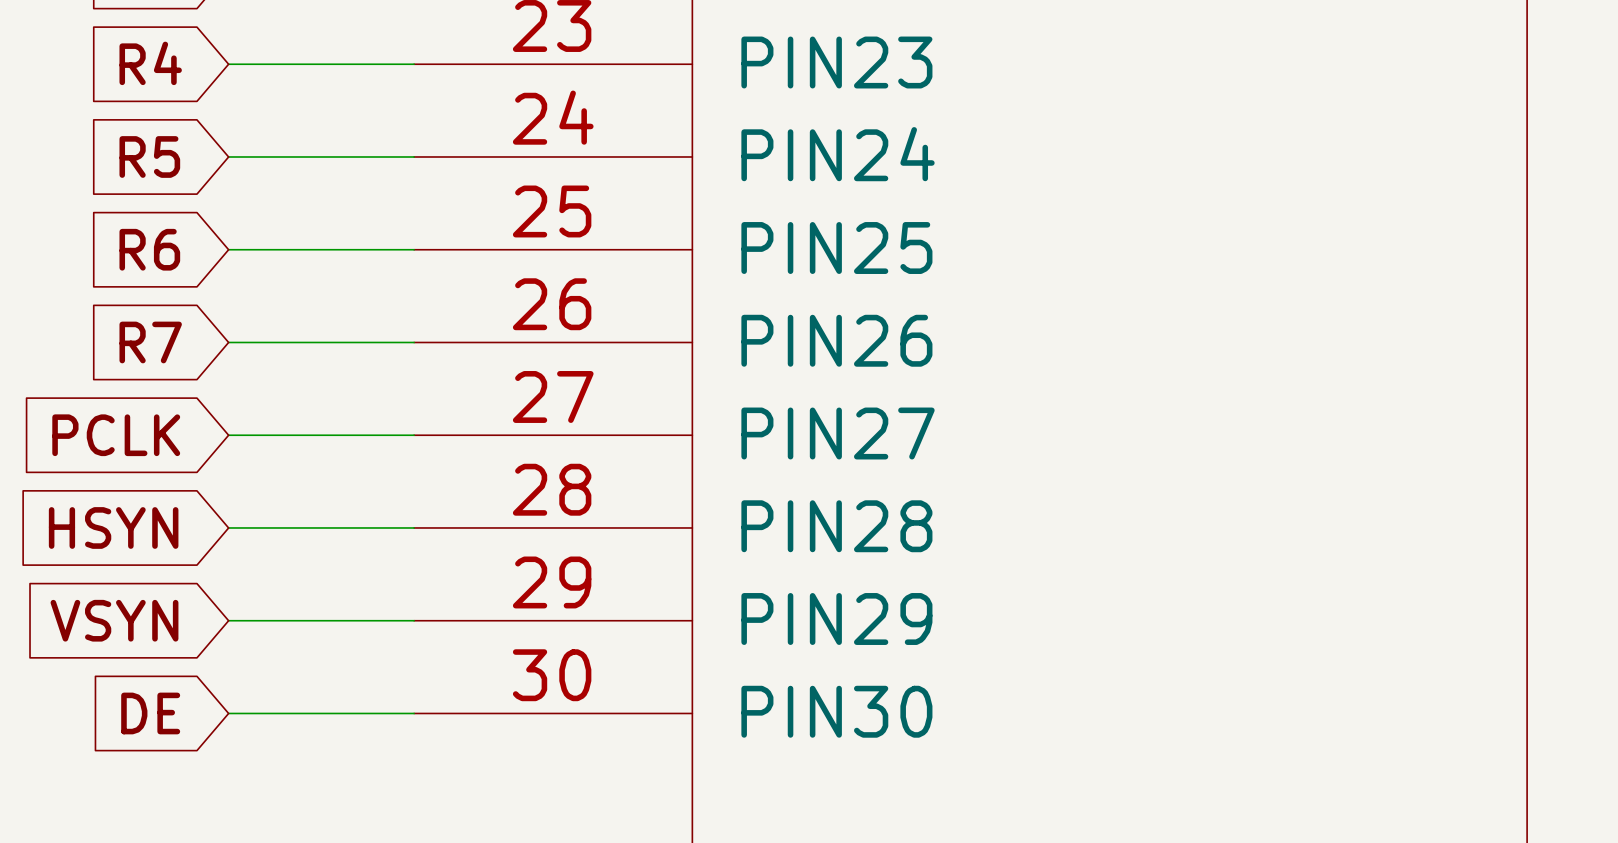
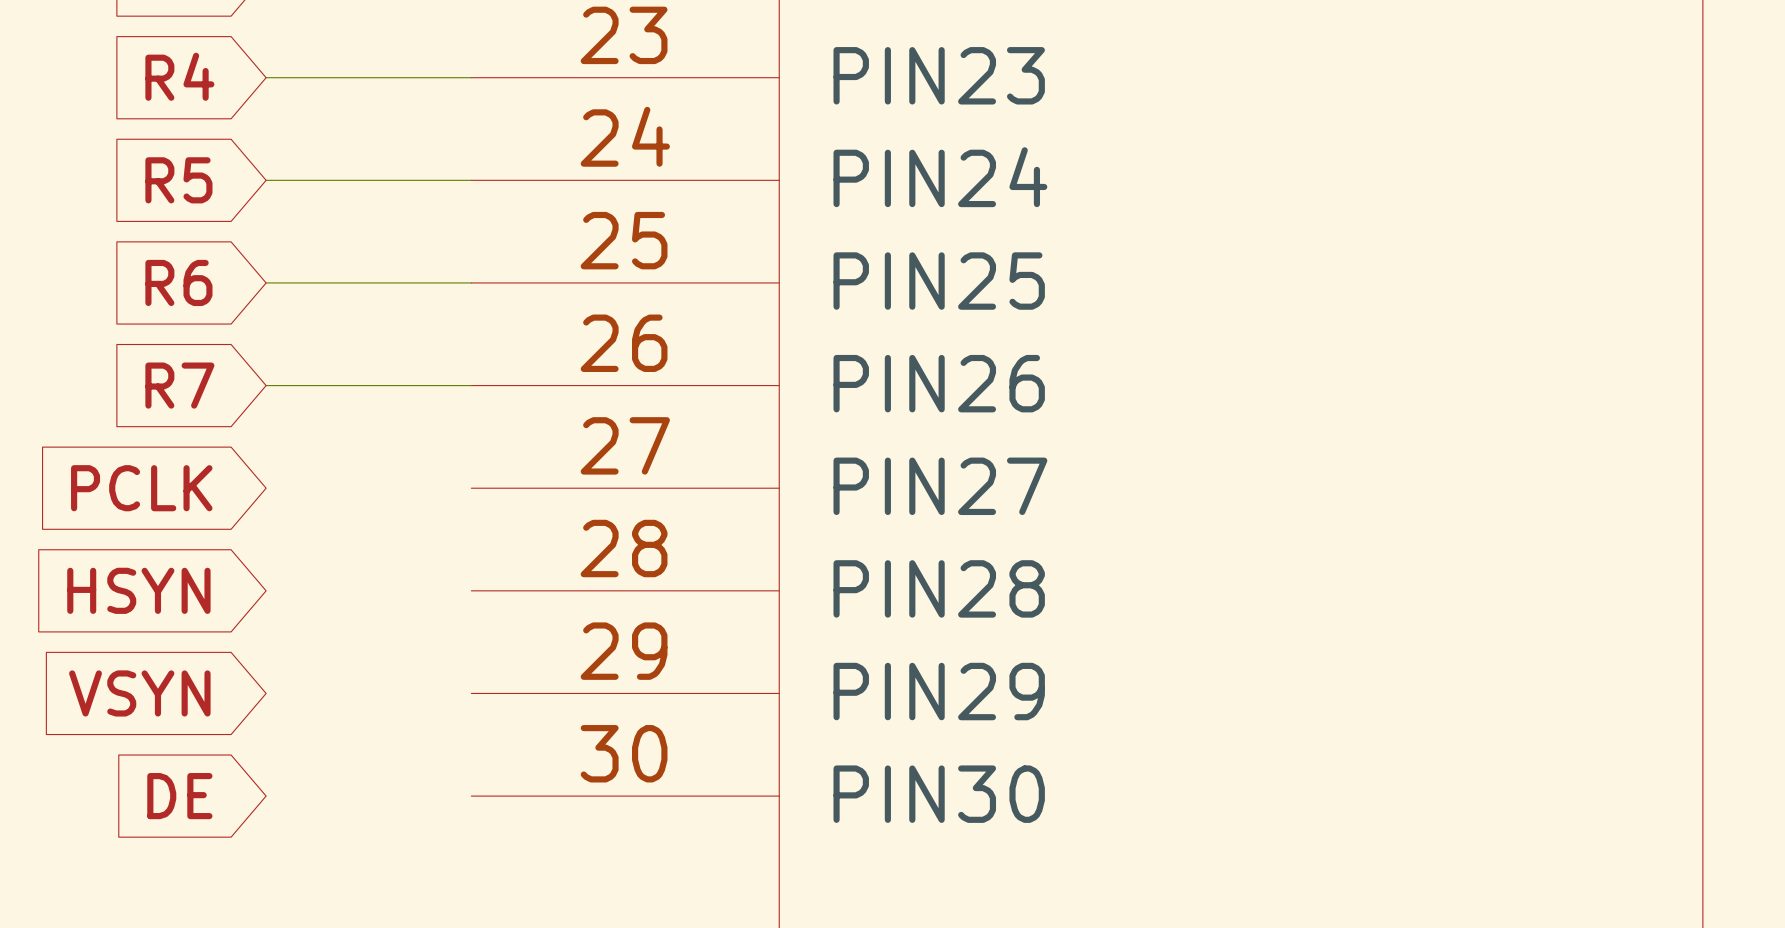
wire: (228, 435) (414, 435) -> none
wire: (228, 527) (414, 527) -> none
wire: (228, 620) (414, 620) -> none
wire: (228, 713) (414, 713) -> none

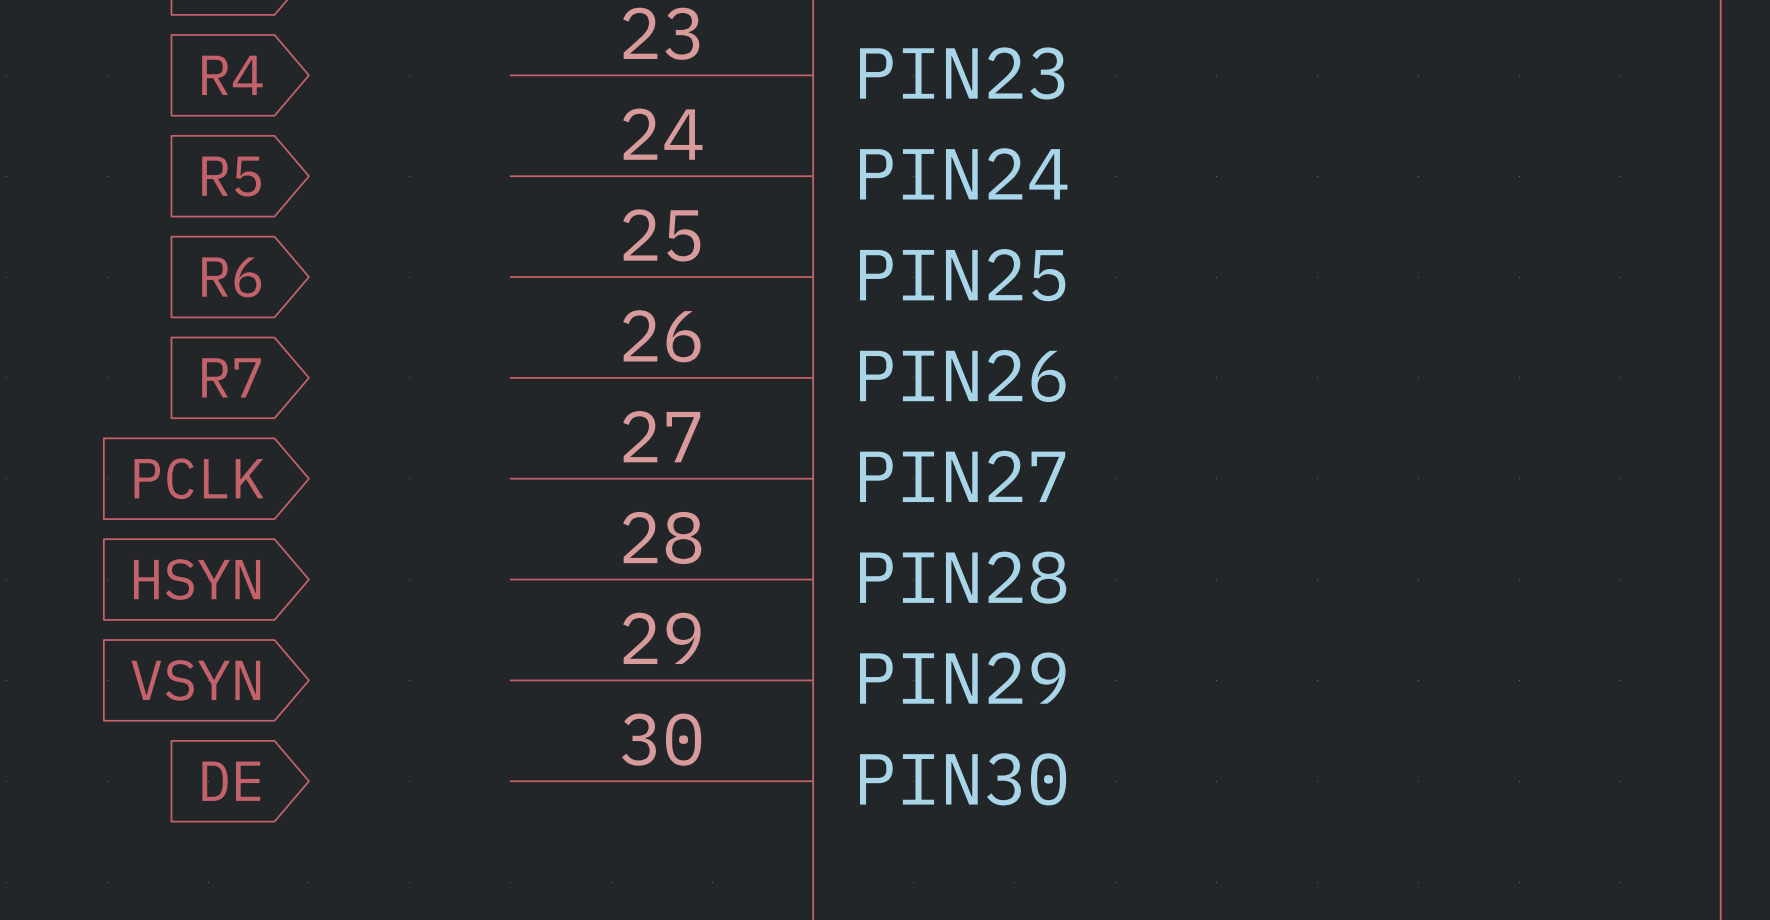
wire: (266, 77) (471, 77) -> none
wire: (266, 180) (471, 180) -> none
wire: (266, 282) (471, 282) -> none
wire: (266, 385) (471, 385) -> none

